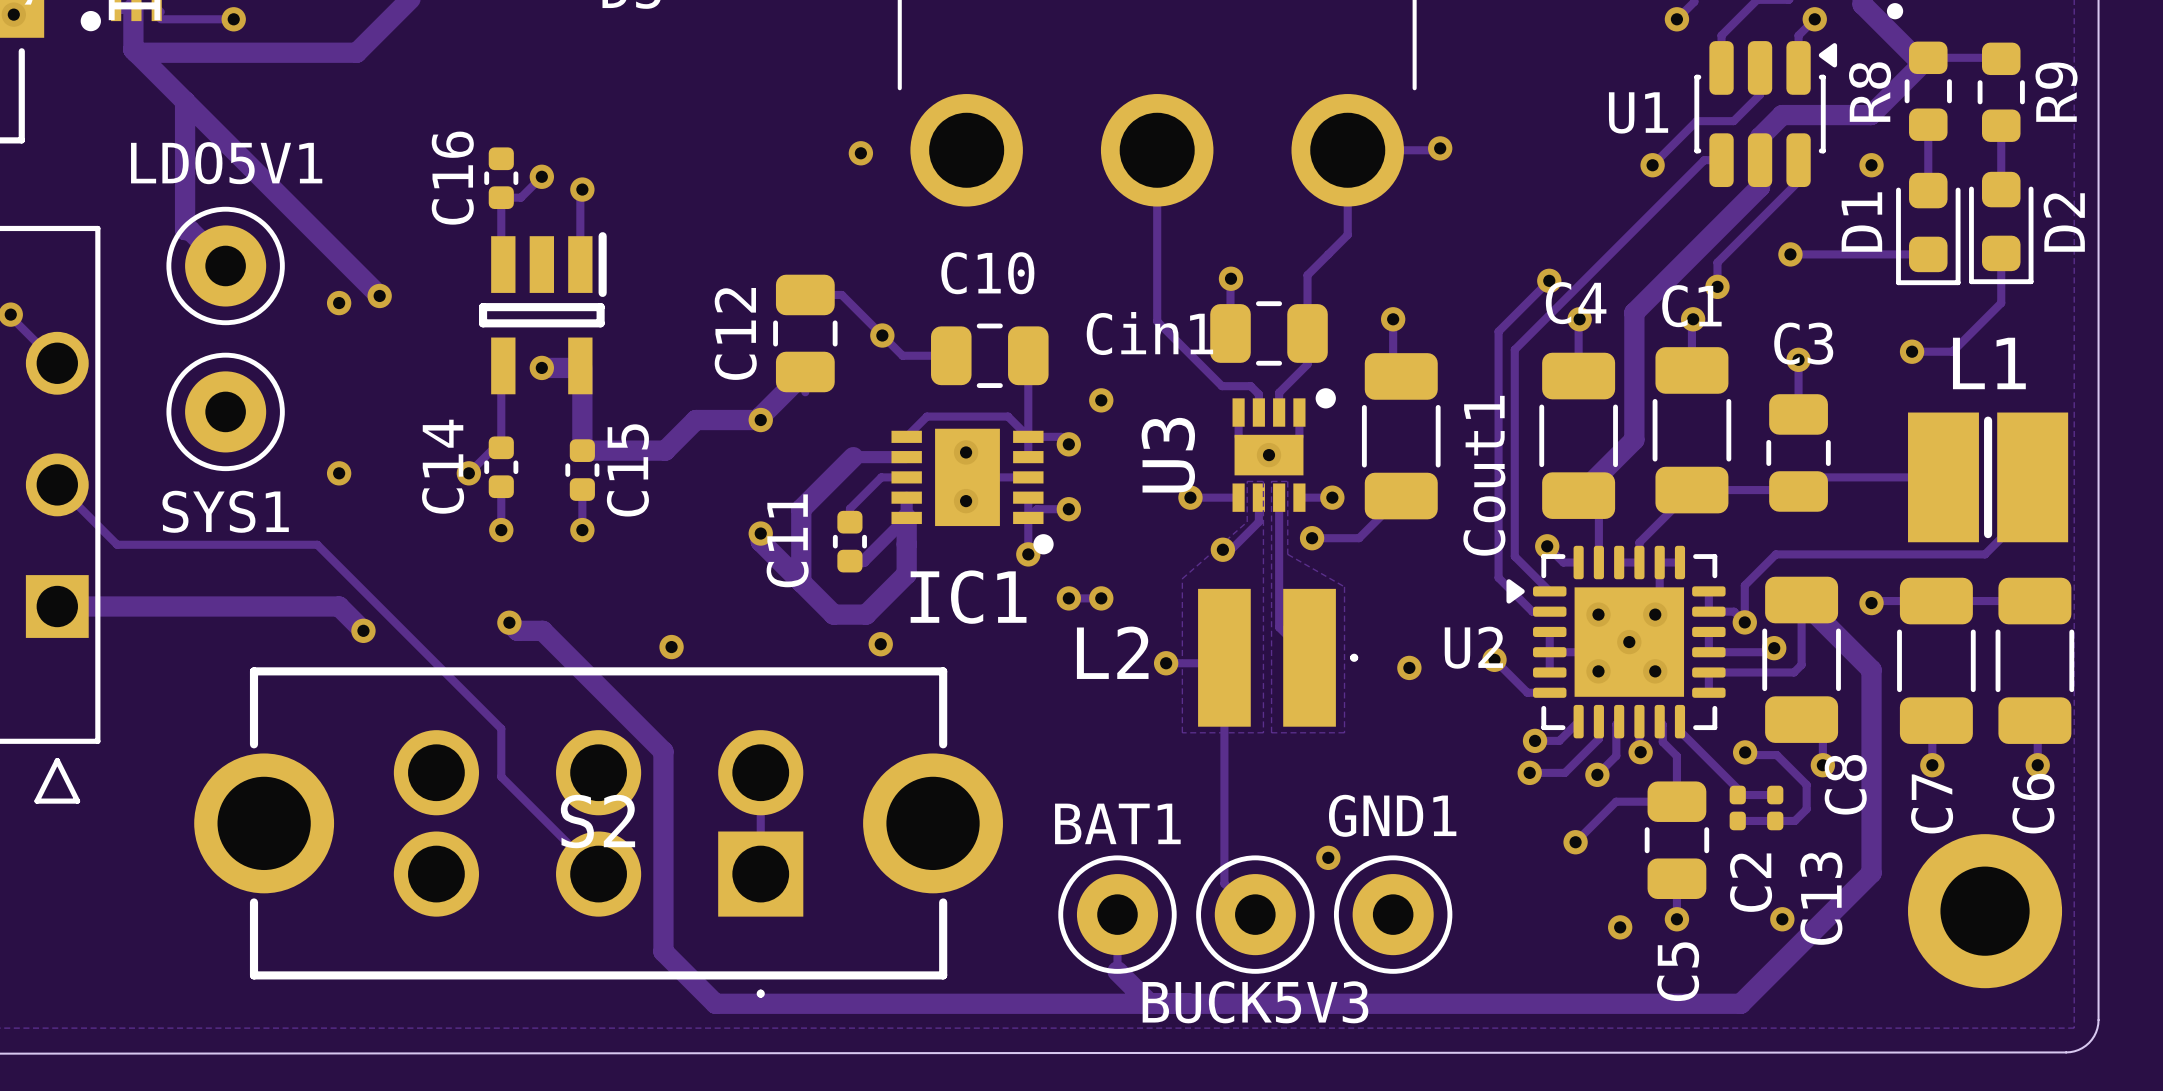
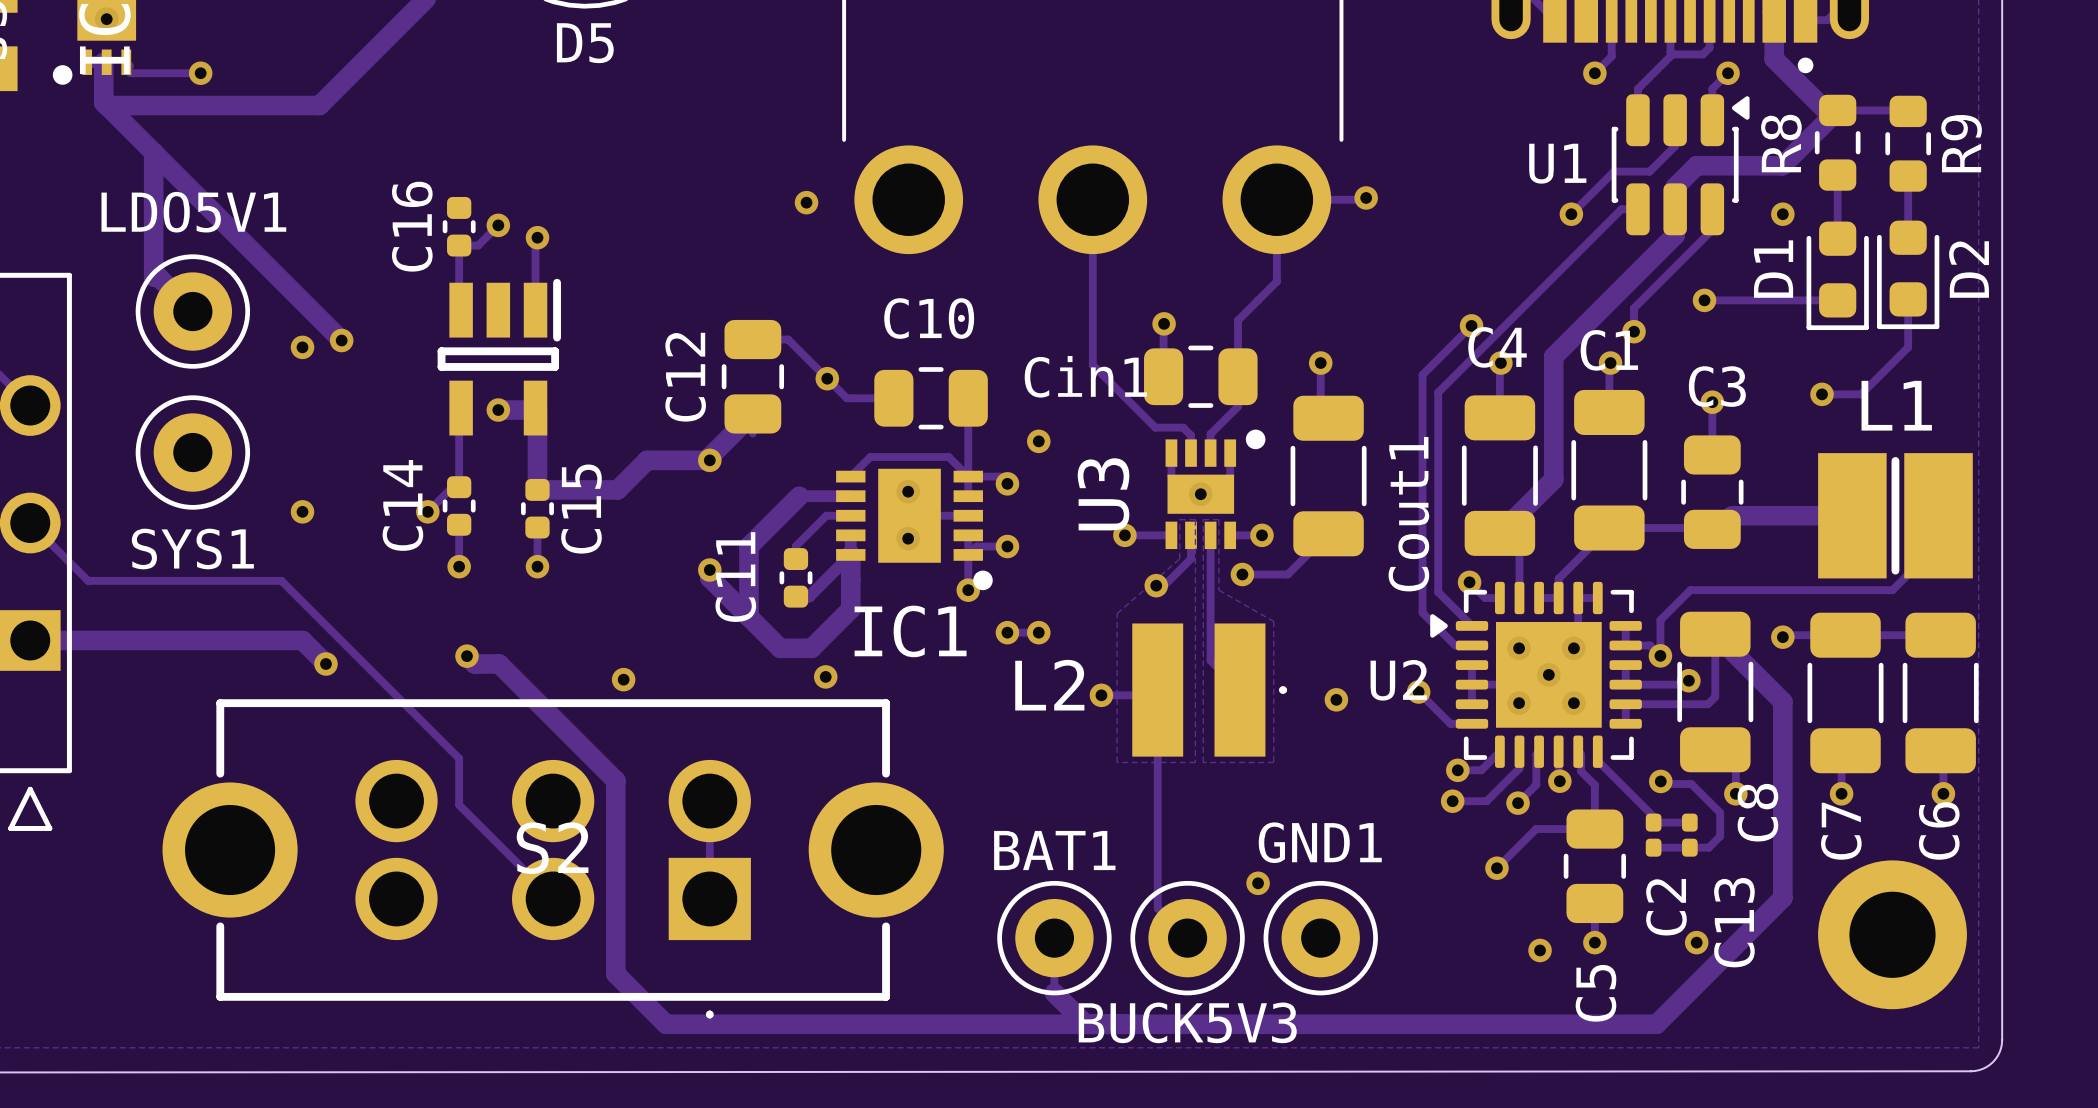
track width: thin (1818, 477) (1943, 477) -> thick (1731, 515) (1852, 515)

